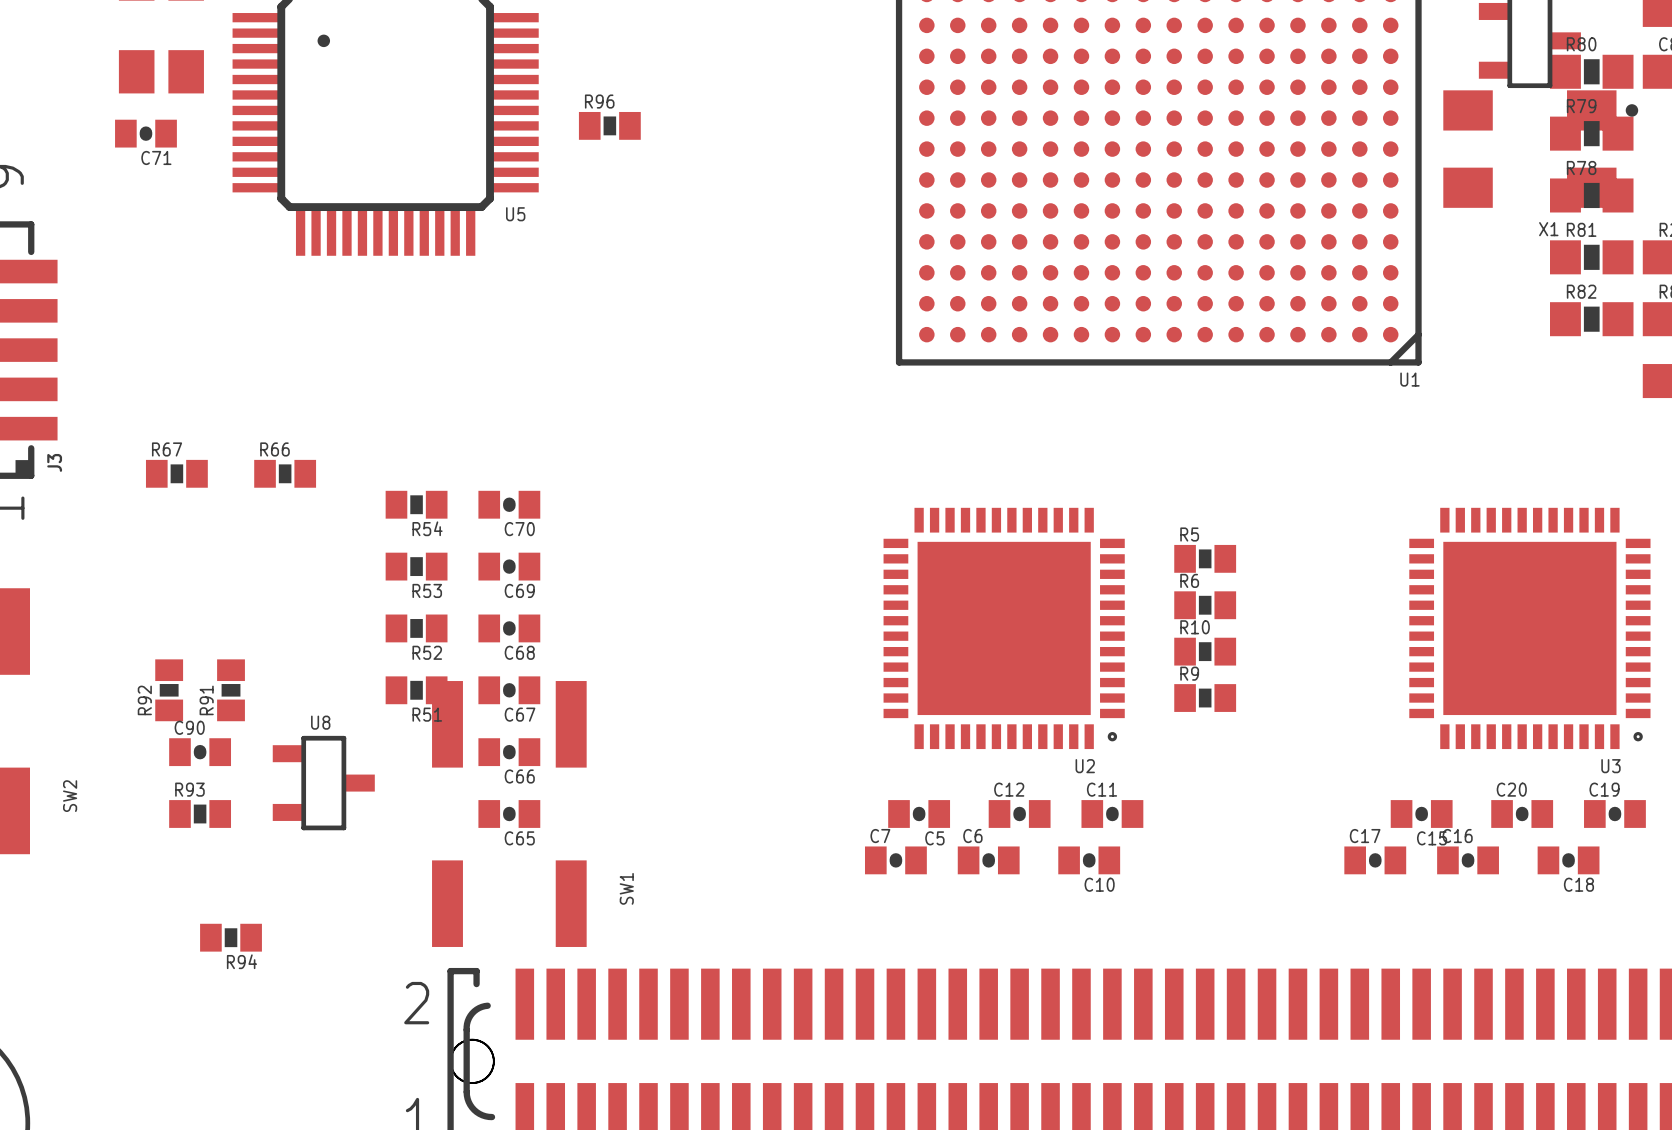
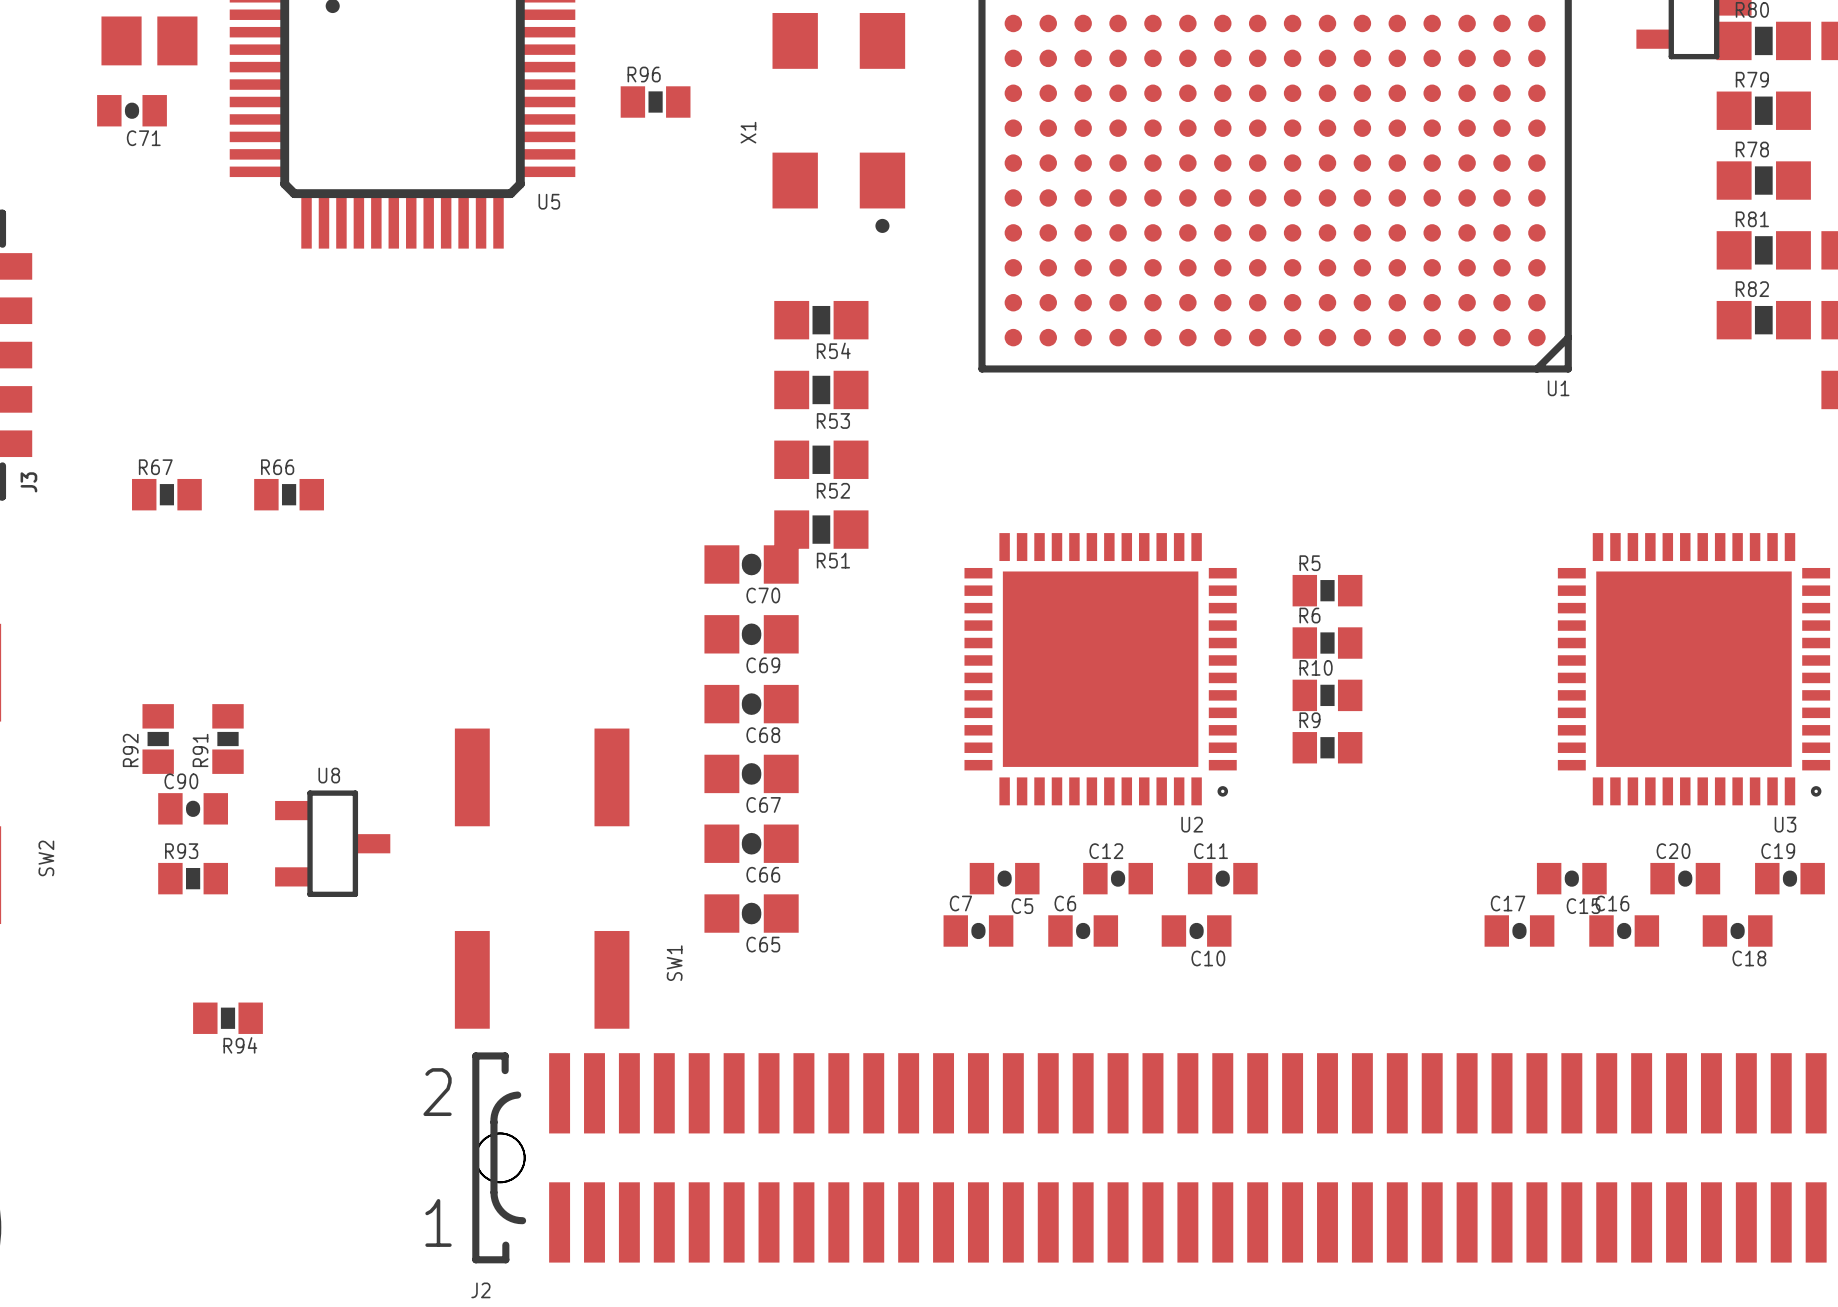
X1 rotation: 0° (1540, 149) -> 90° clockwise (838, 122)
X1 position: (1540, 149) -> (838, 122)
R54 footprint: [385, 490, 448, 519] -> [774, 300, 869, 340]
C70 footprint: [478, 490, 541, 519] -> [704, 545, 799, 584]
R53 footprint: [385, 552, 448, 581] -> [774, 370, 869, 410]
C69 footprint: [478, 552, 541, 581] -> [704, 615, 799, 654]
R52 footprint: [385, 614, 448, 643] -> [774, 440, 869, 479]
C68 footprint: [478, 614, 541, 643] -> [704, 684, 799, 724]
R51 footprint: [385, 676, 448, 705] -> [774, 510, 869, 549]
C67 footprint: [478, 676, 541, 705] -> [704, 754, 799, 794]
C66 footprint: [478, 738, 541, 767] -> [704, 824, 799, 863]
C65 footprint: [478, 800, 541, 828] -> [704, 894, 799, 933]

